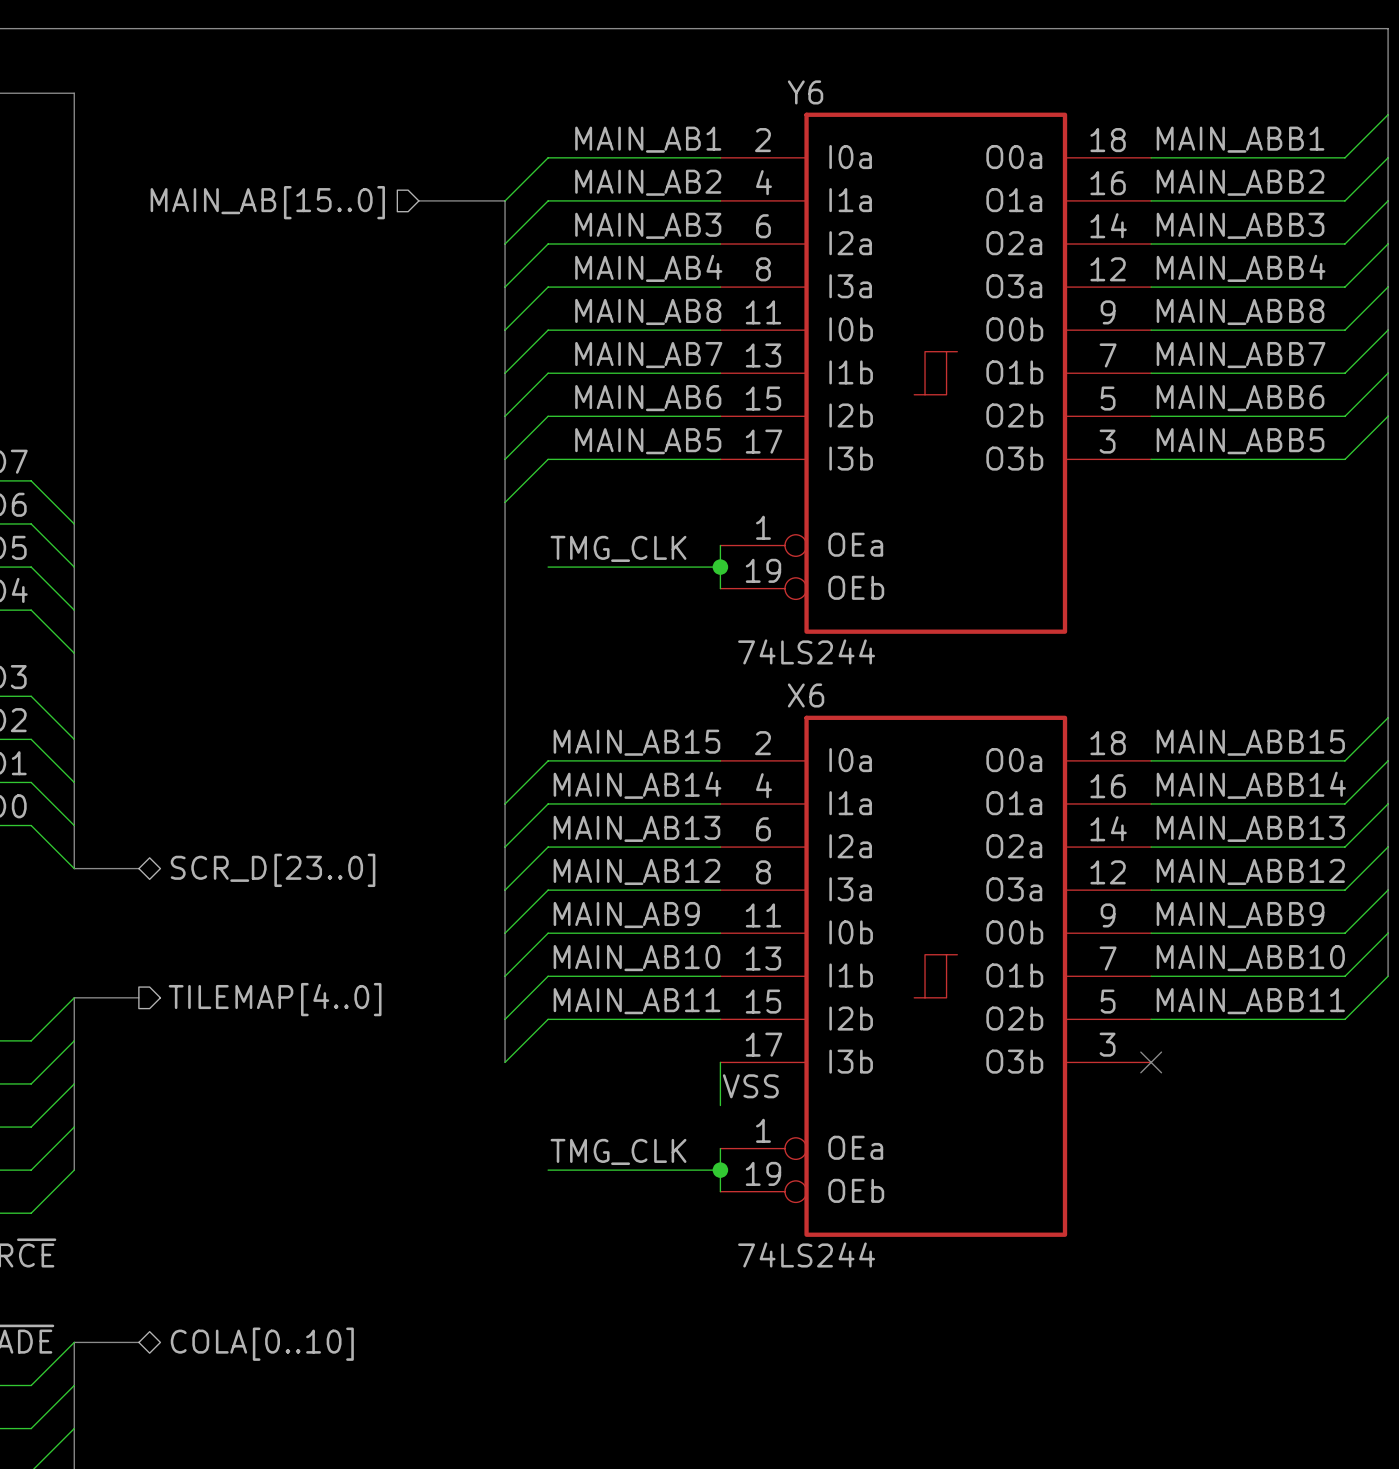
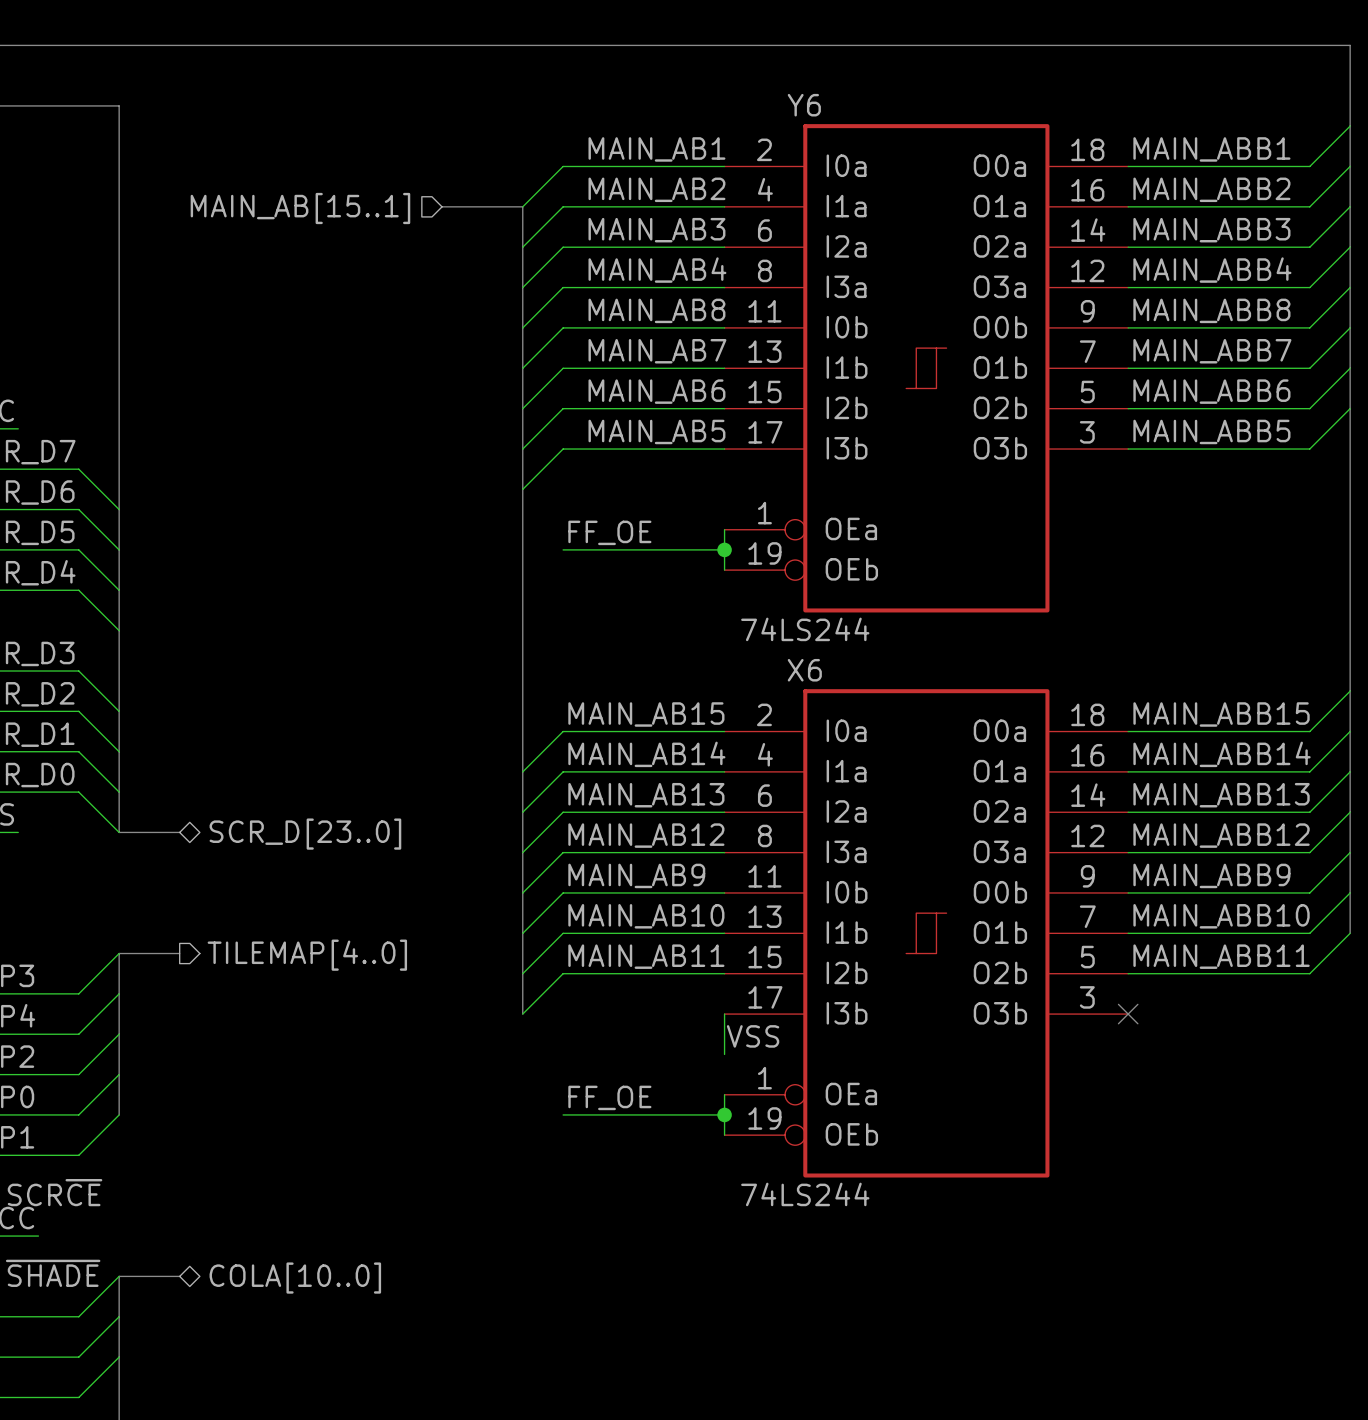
hierarchical label: MAIN_AB[15..0] (267, 202) -> MAIN_AB[15..1] (300, 208)
label: TMG_CLK (618, 548) -> FF_OE (609, 532)
label: TMG_CLK (618, 1151) -> FF_OE (609, 1097)
hierarchical label: COLA[0..10] (262, 1344) -> COLA[10..0] (295, 1278)

